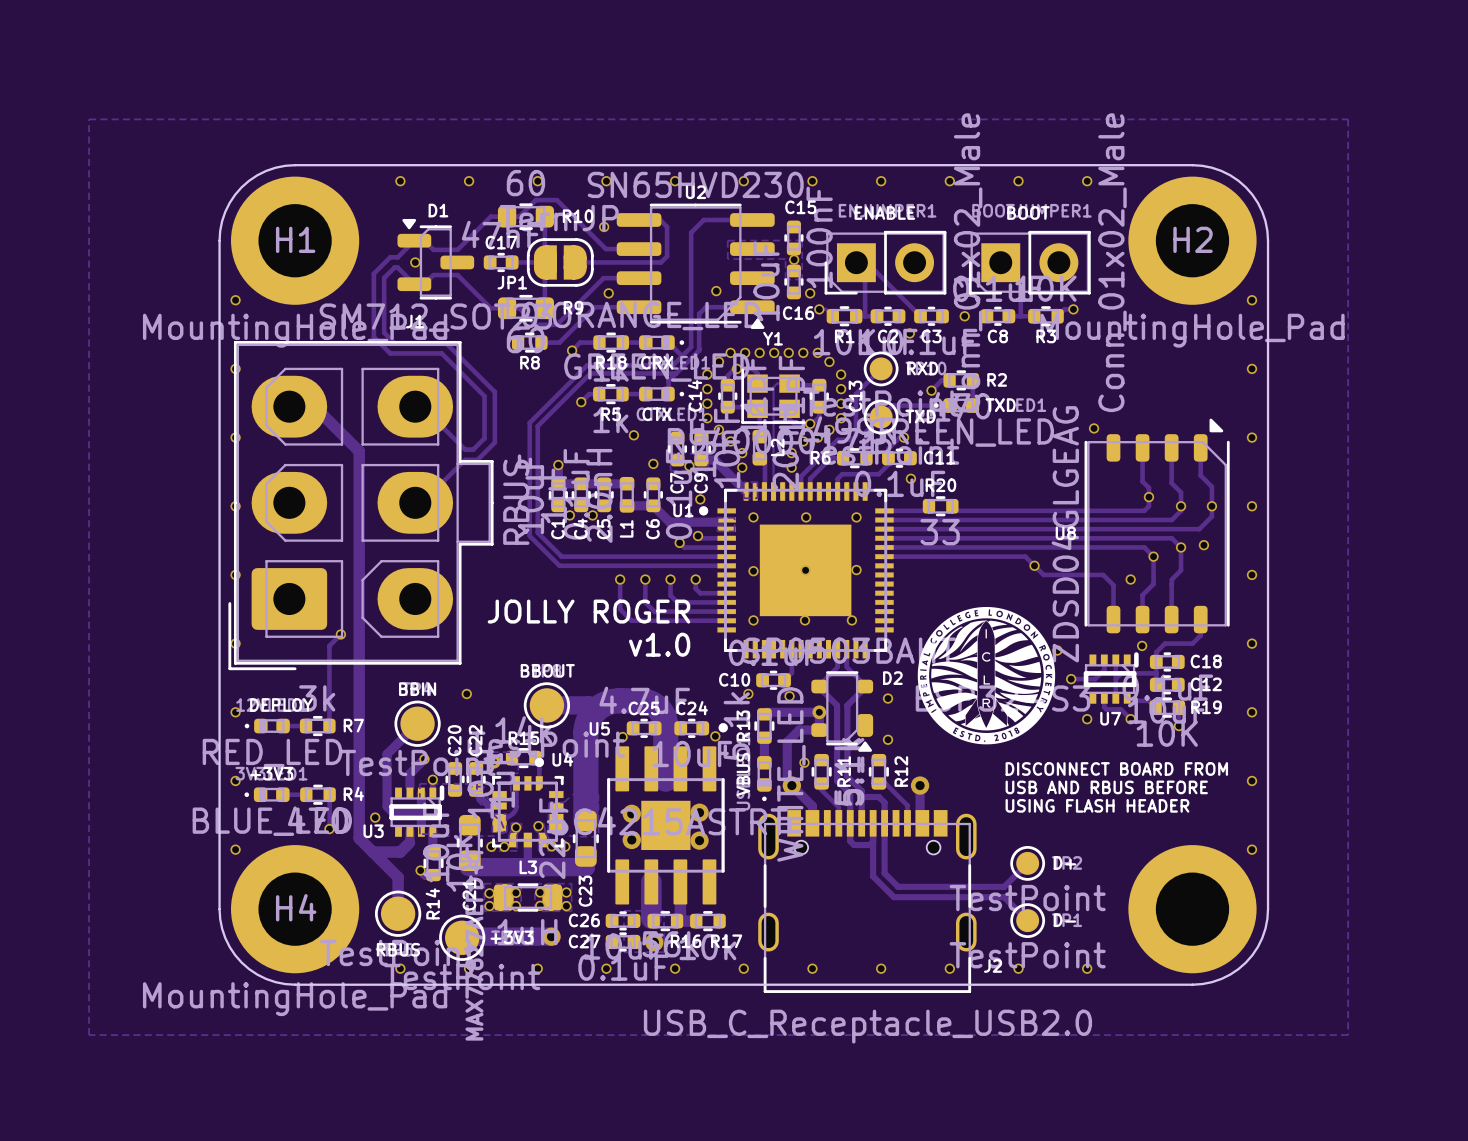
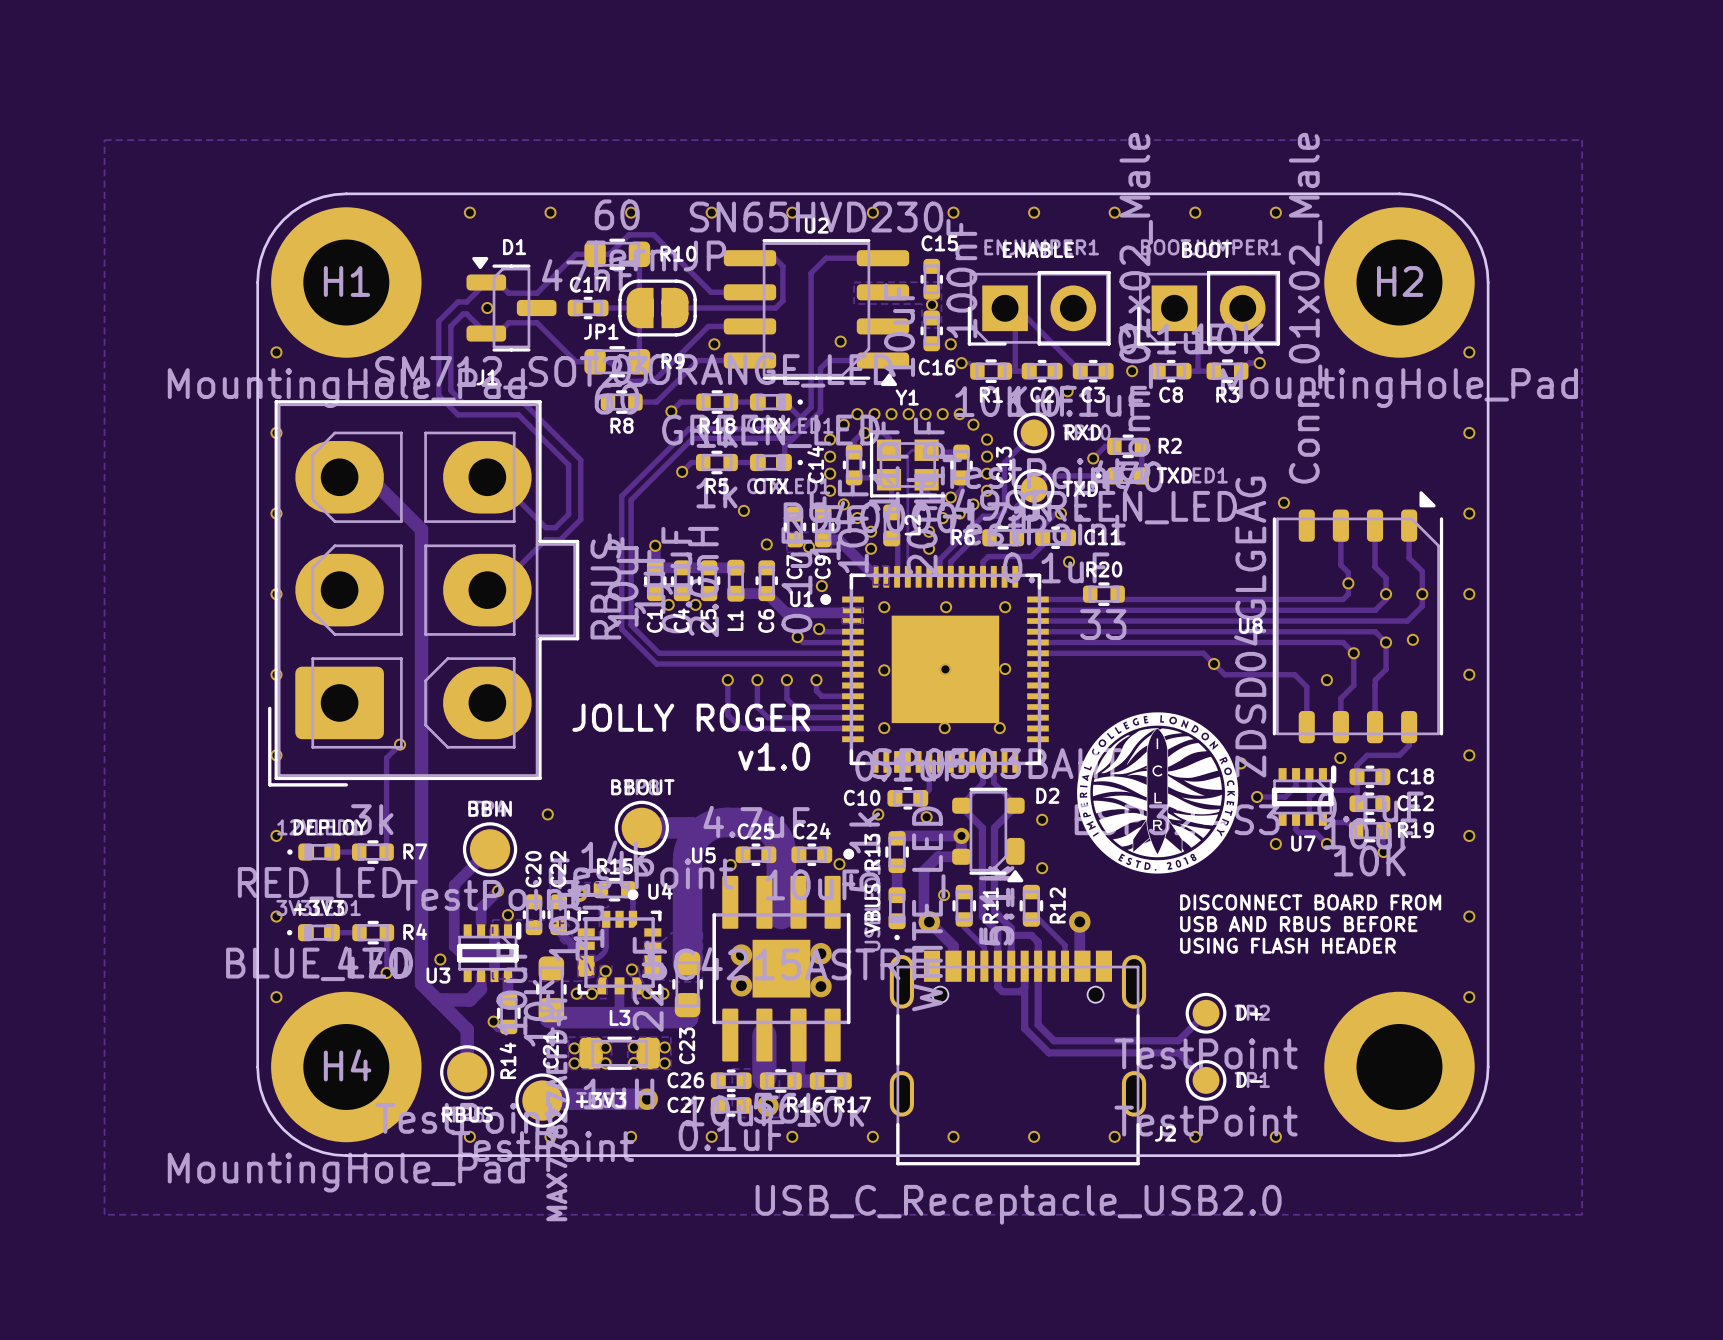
via: (604, 226) -> none

